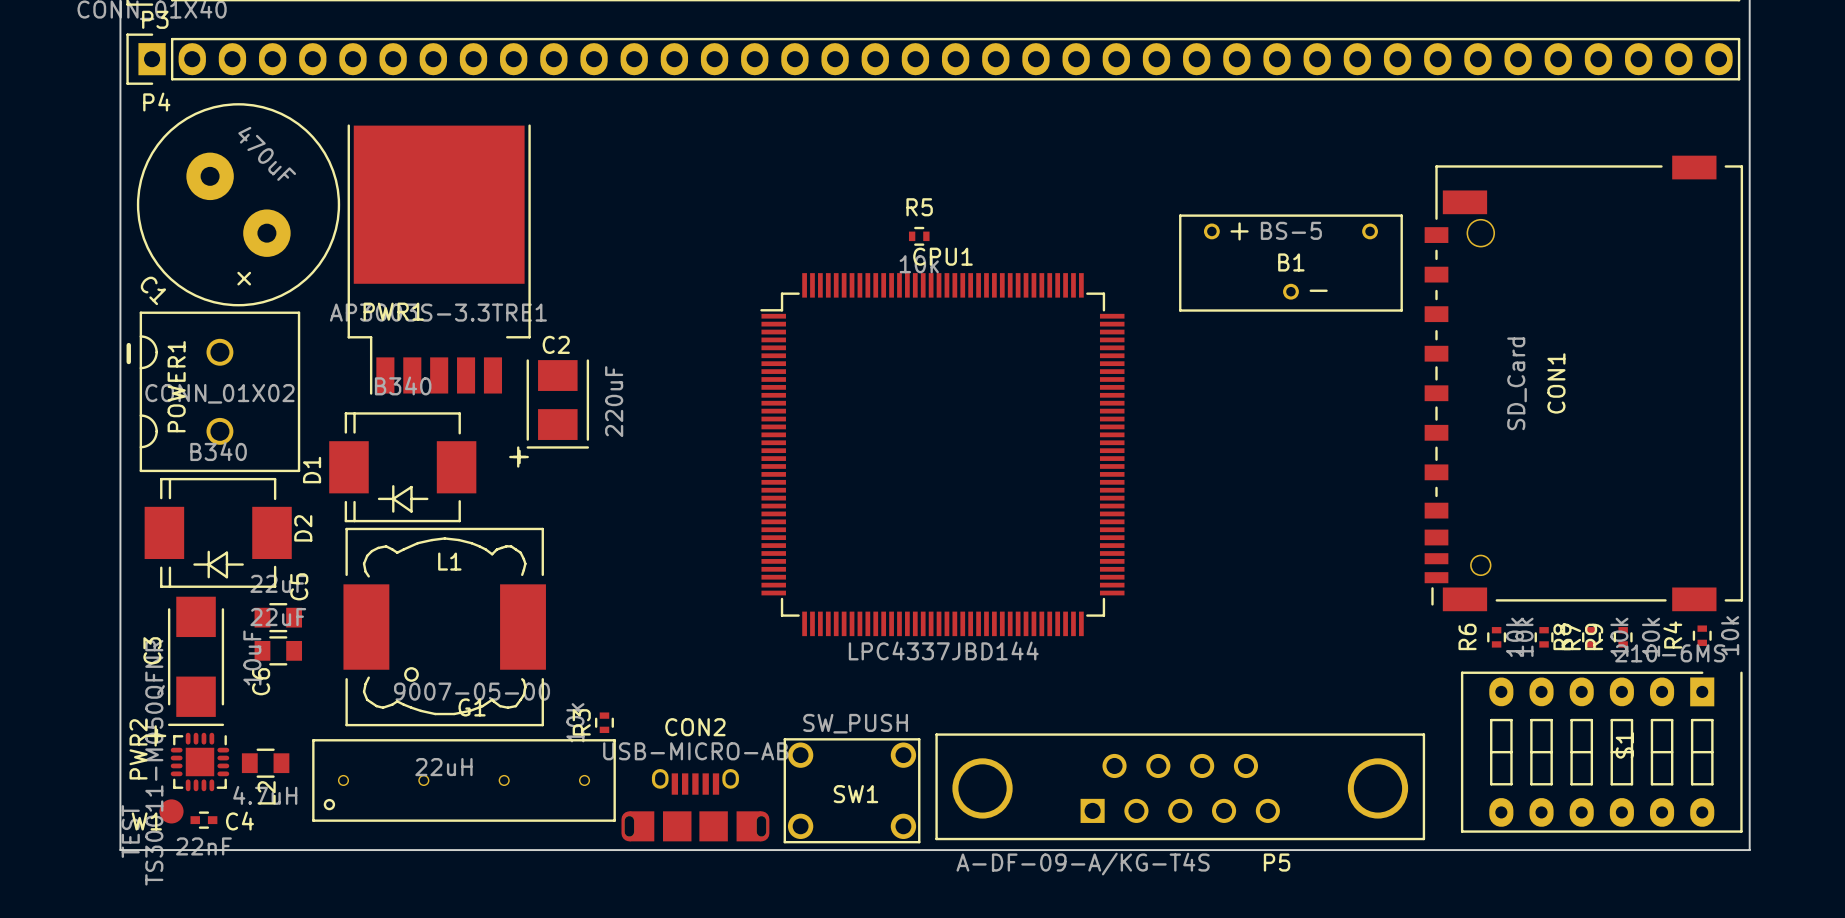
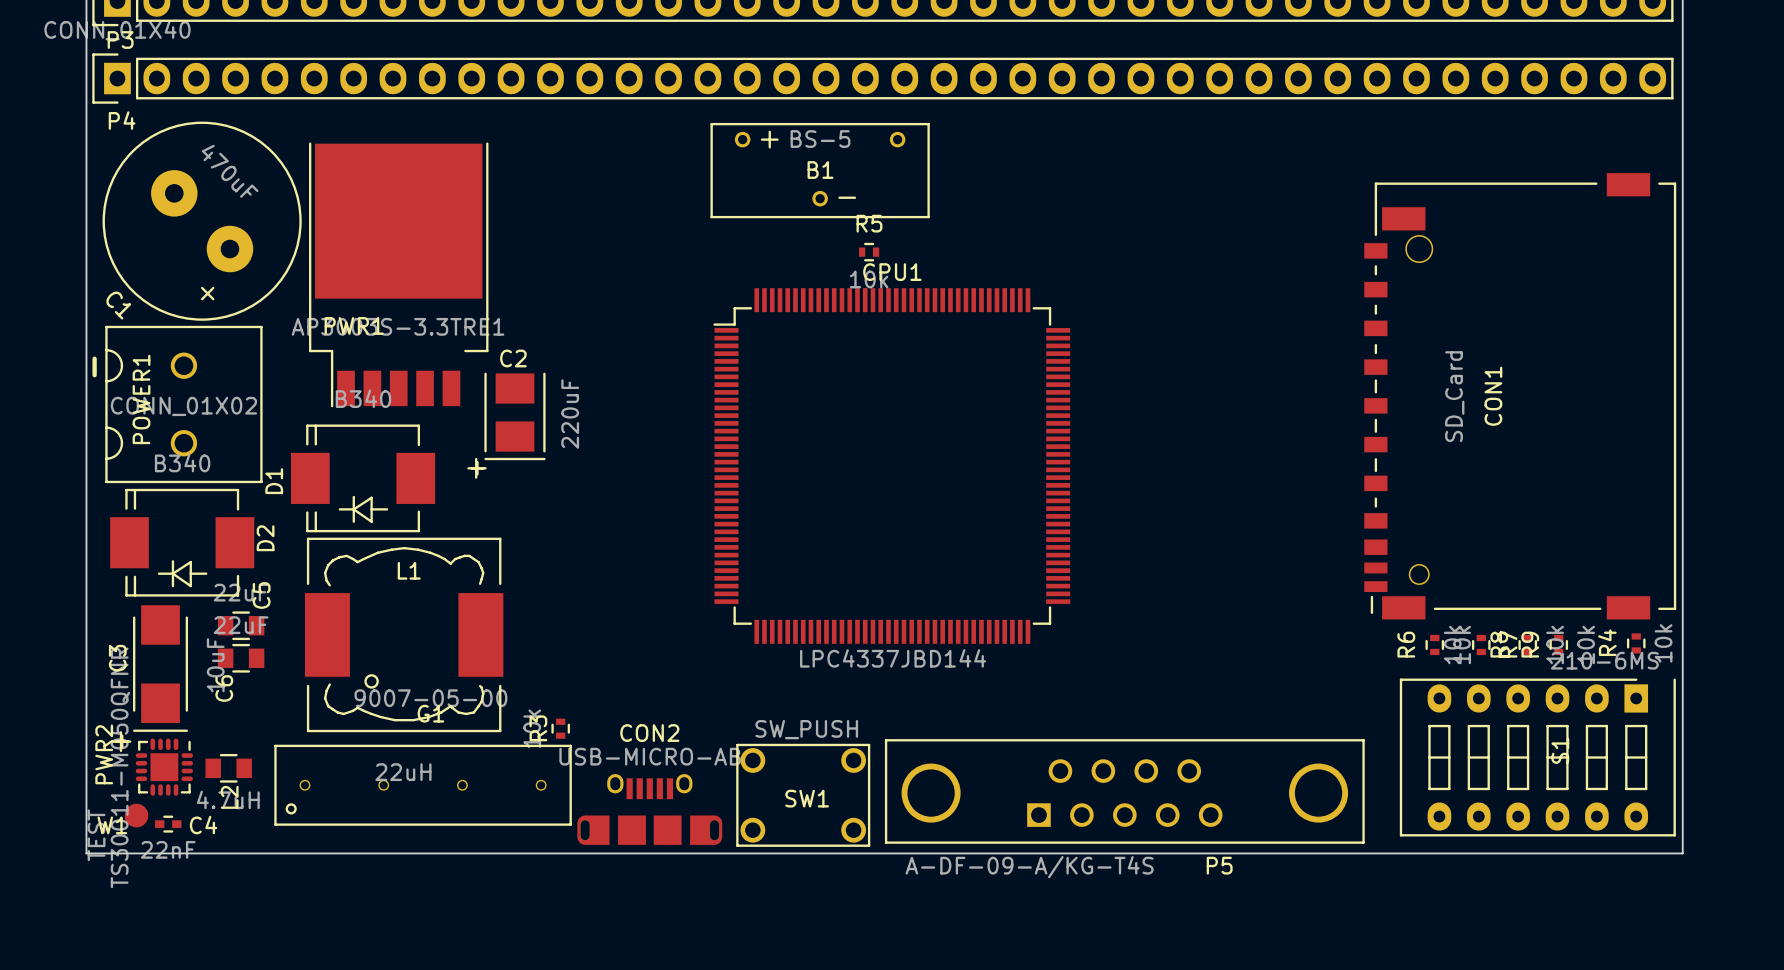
B1 position: (1290, 263) -> (820, 170)

